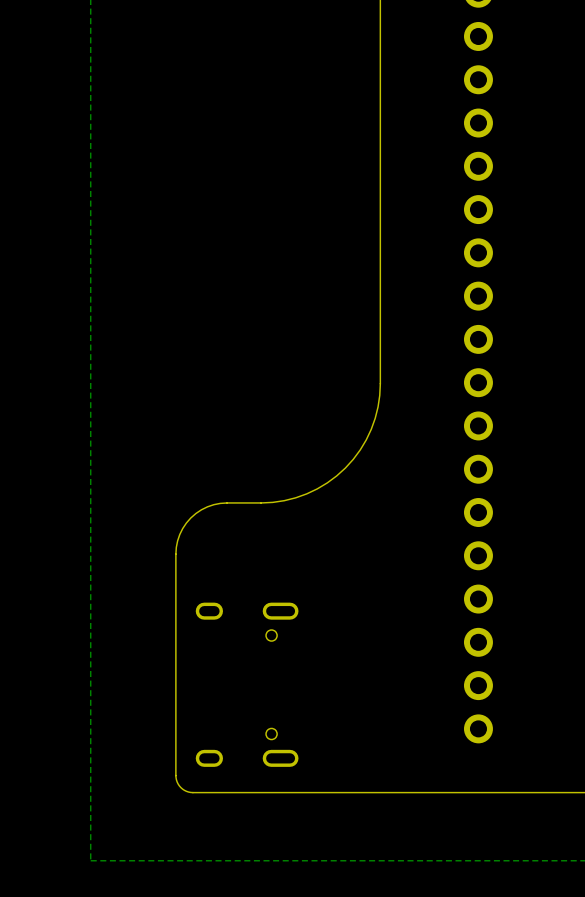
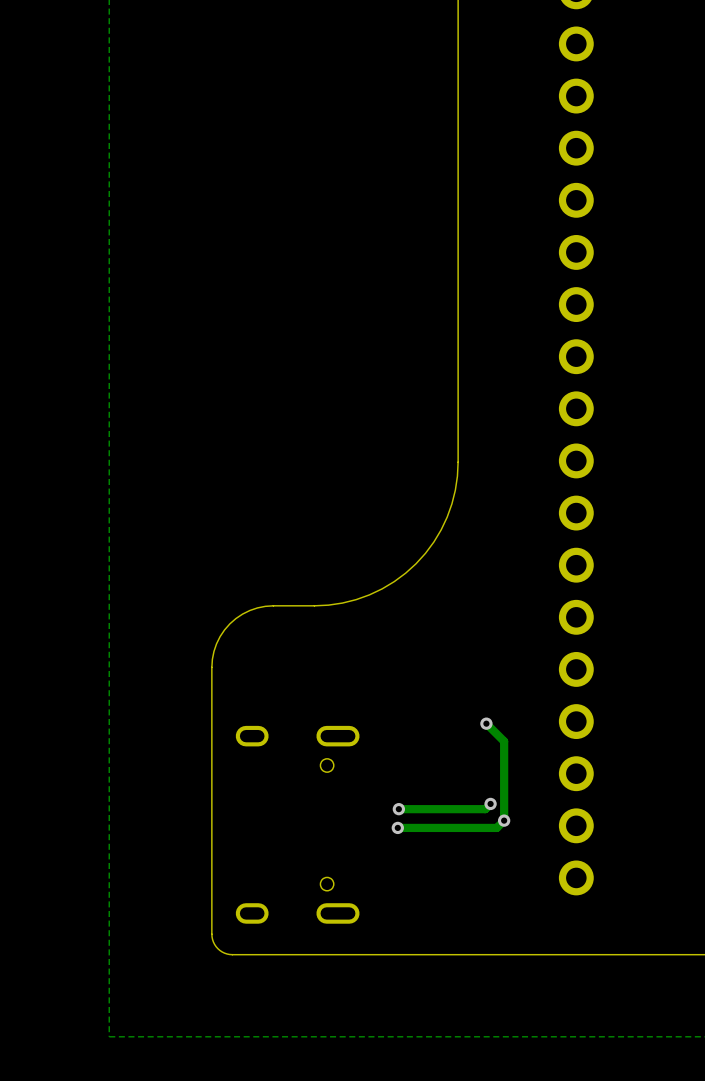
track: none -> (486, 723) (504, 741) (504, 820) (496, 827) (397, 827)
via: none -> (486, 723)
track: none -> (490, 803) (485, 809) (398, 809)
via: none -> (490, 803)
via: none -> (398, 809)
via: none -> (504, 820)
via: none -> (397, 827)

